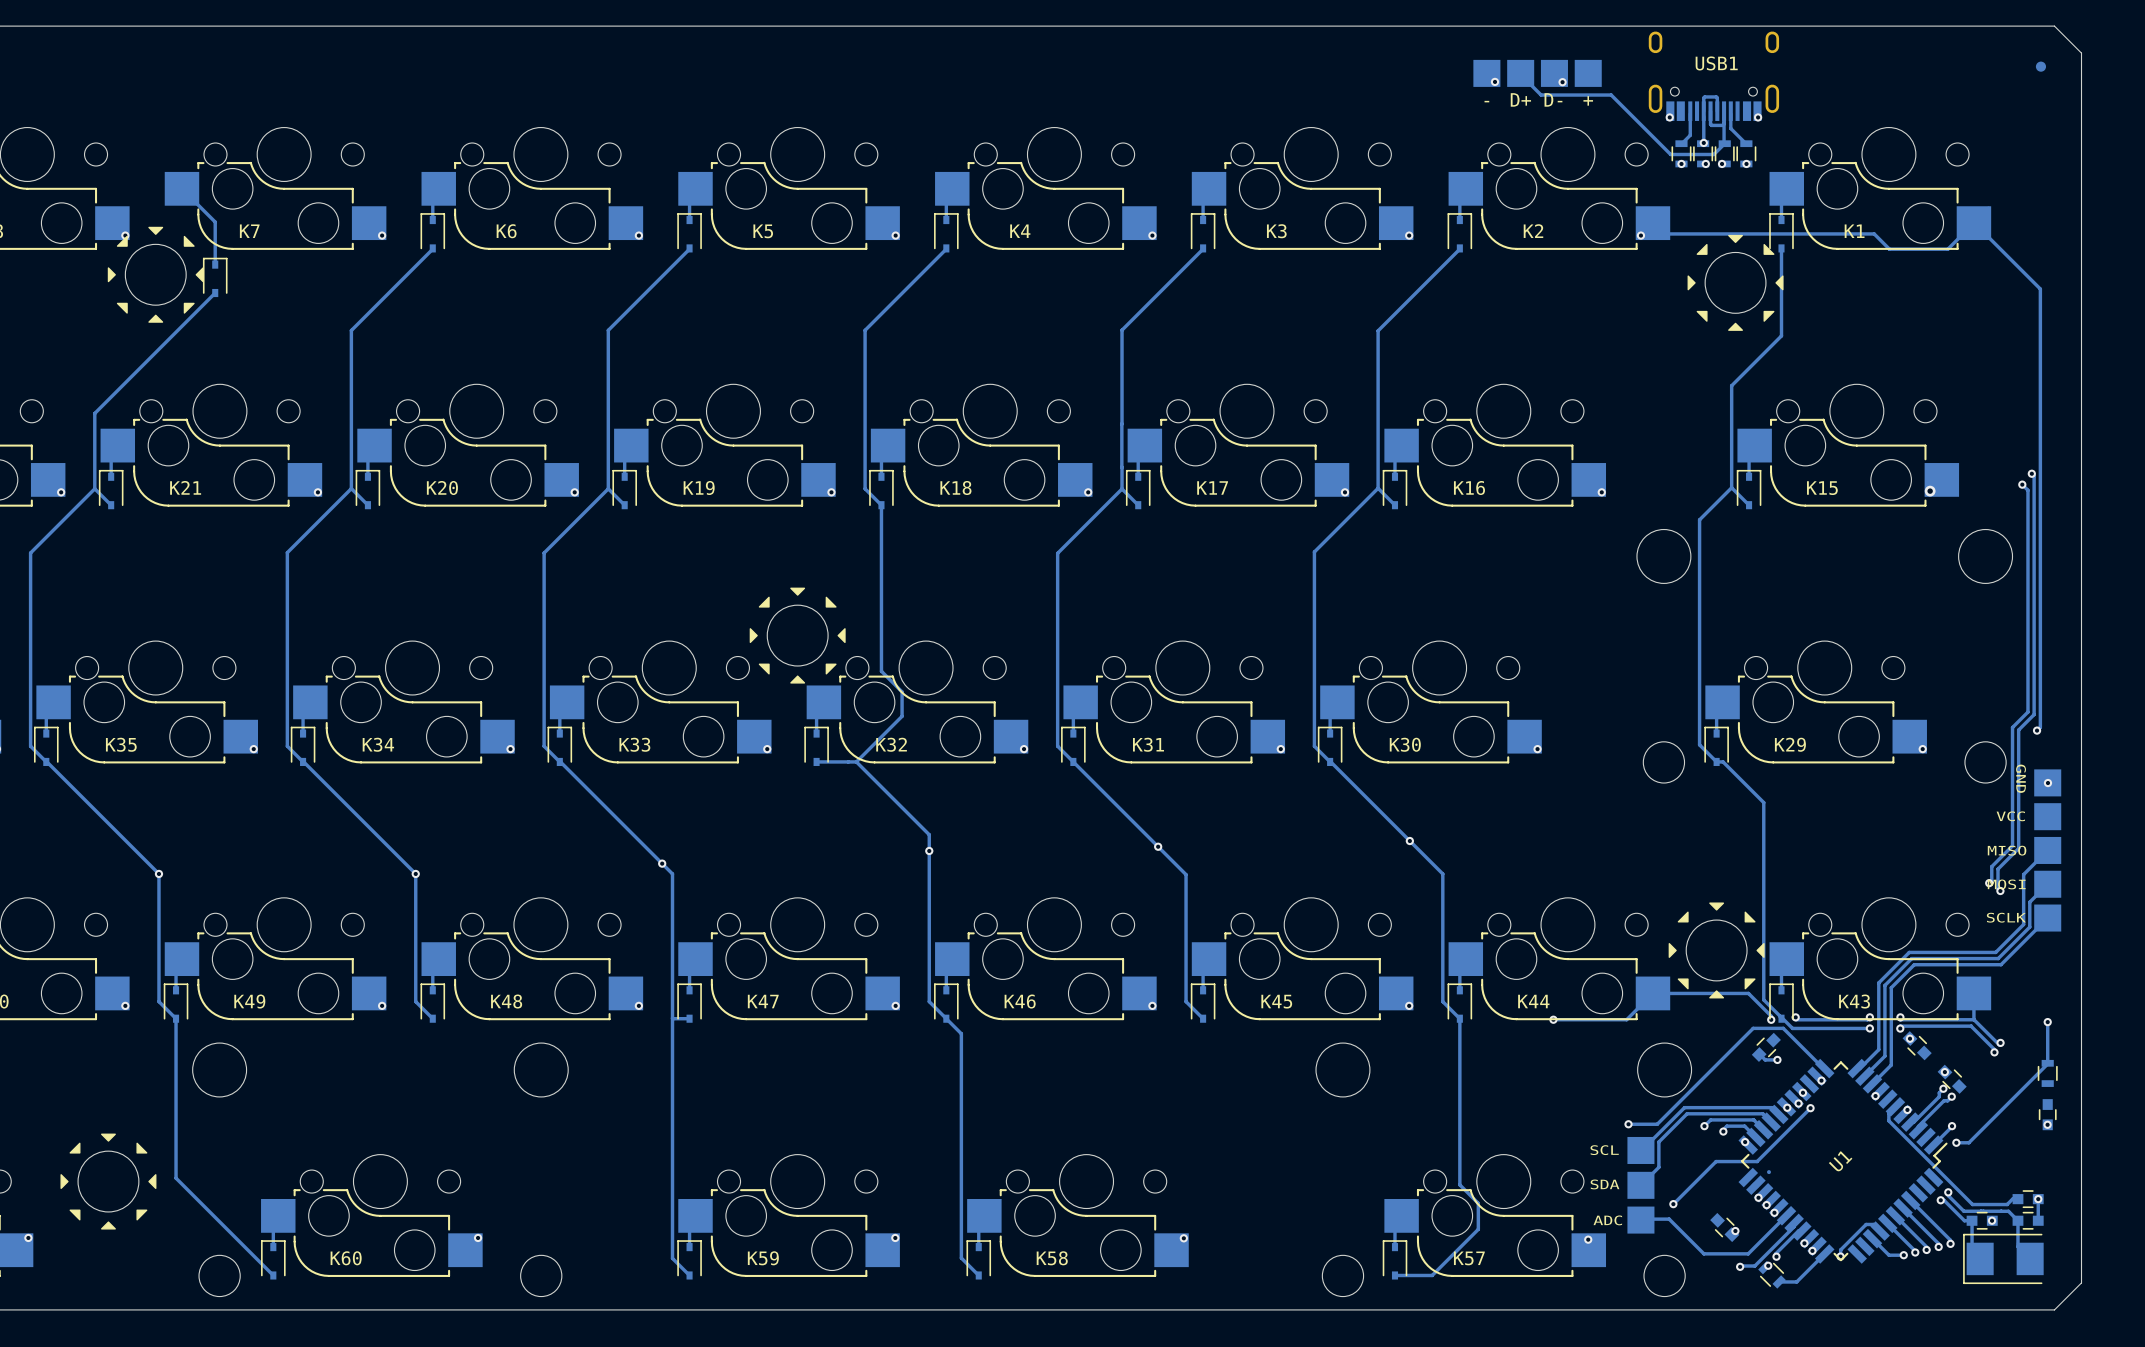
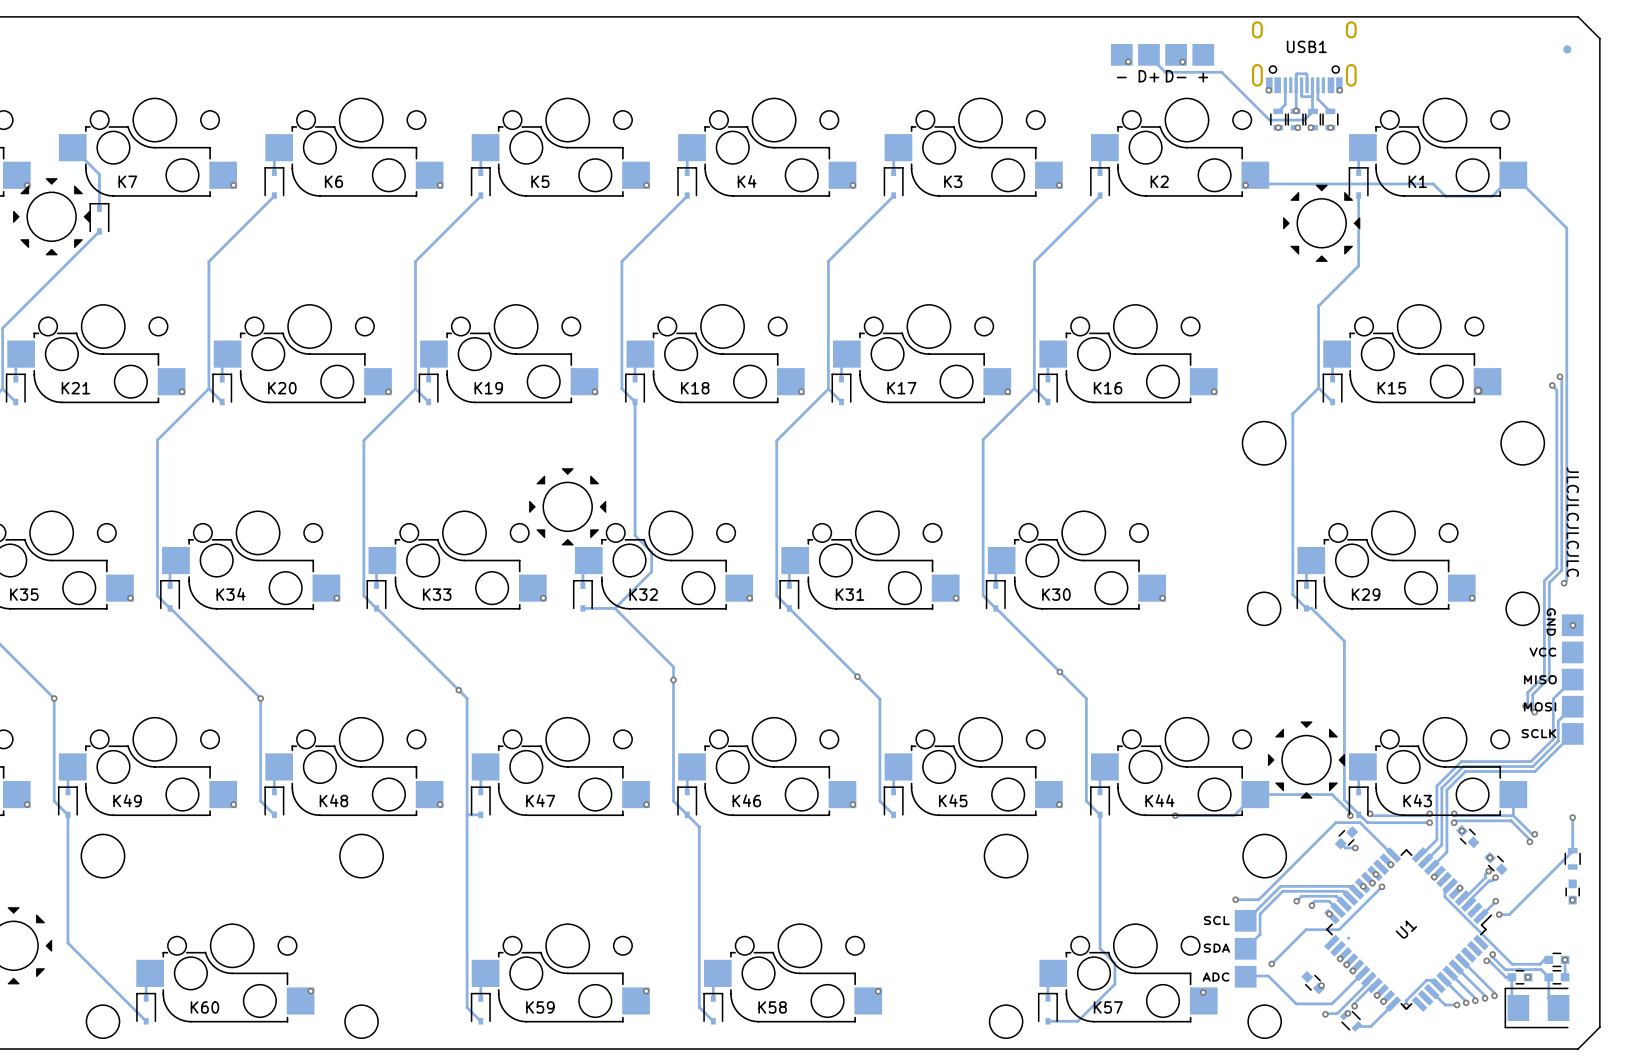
text: none -> JLCJLCJLCJLC (1572, 522)

